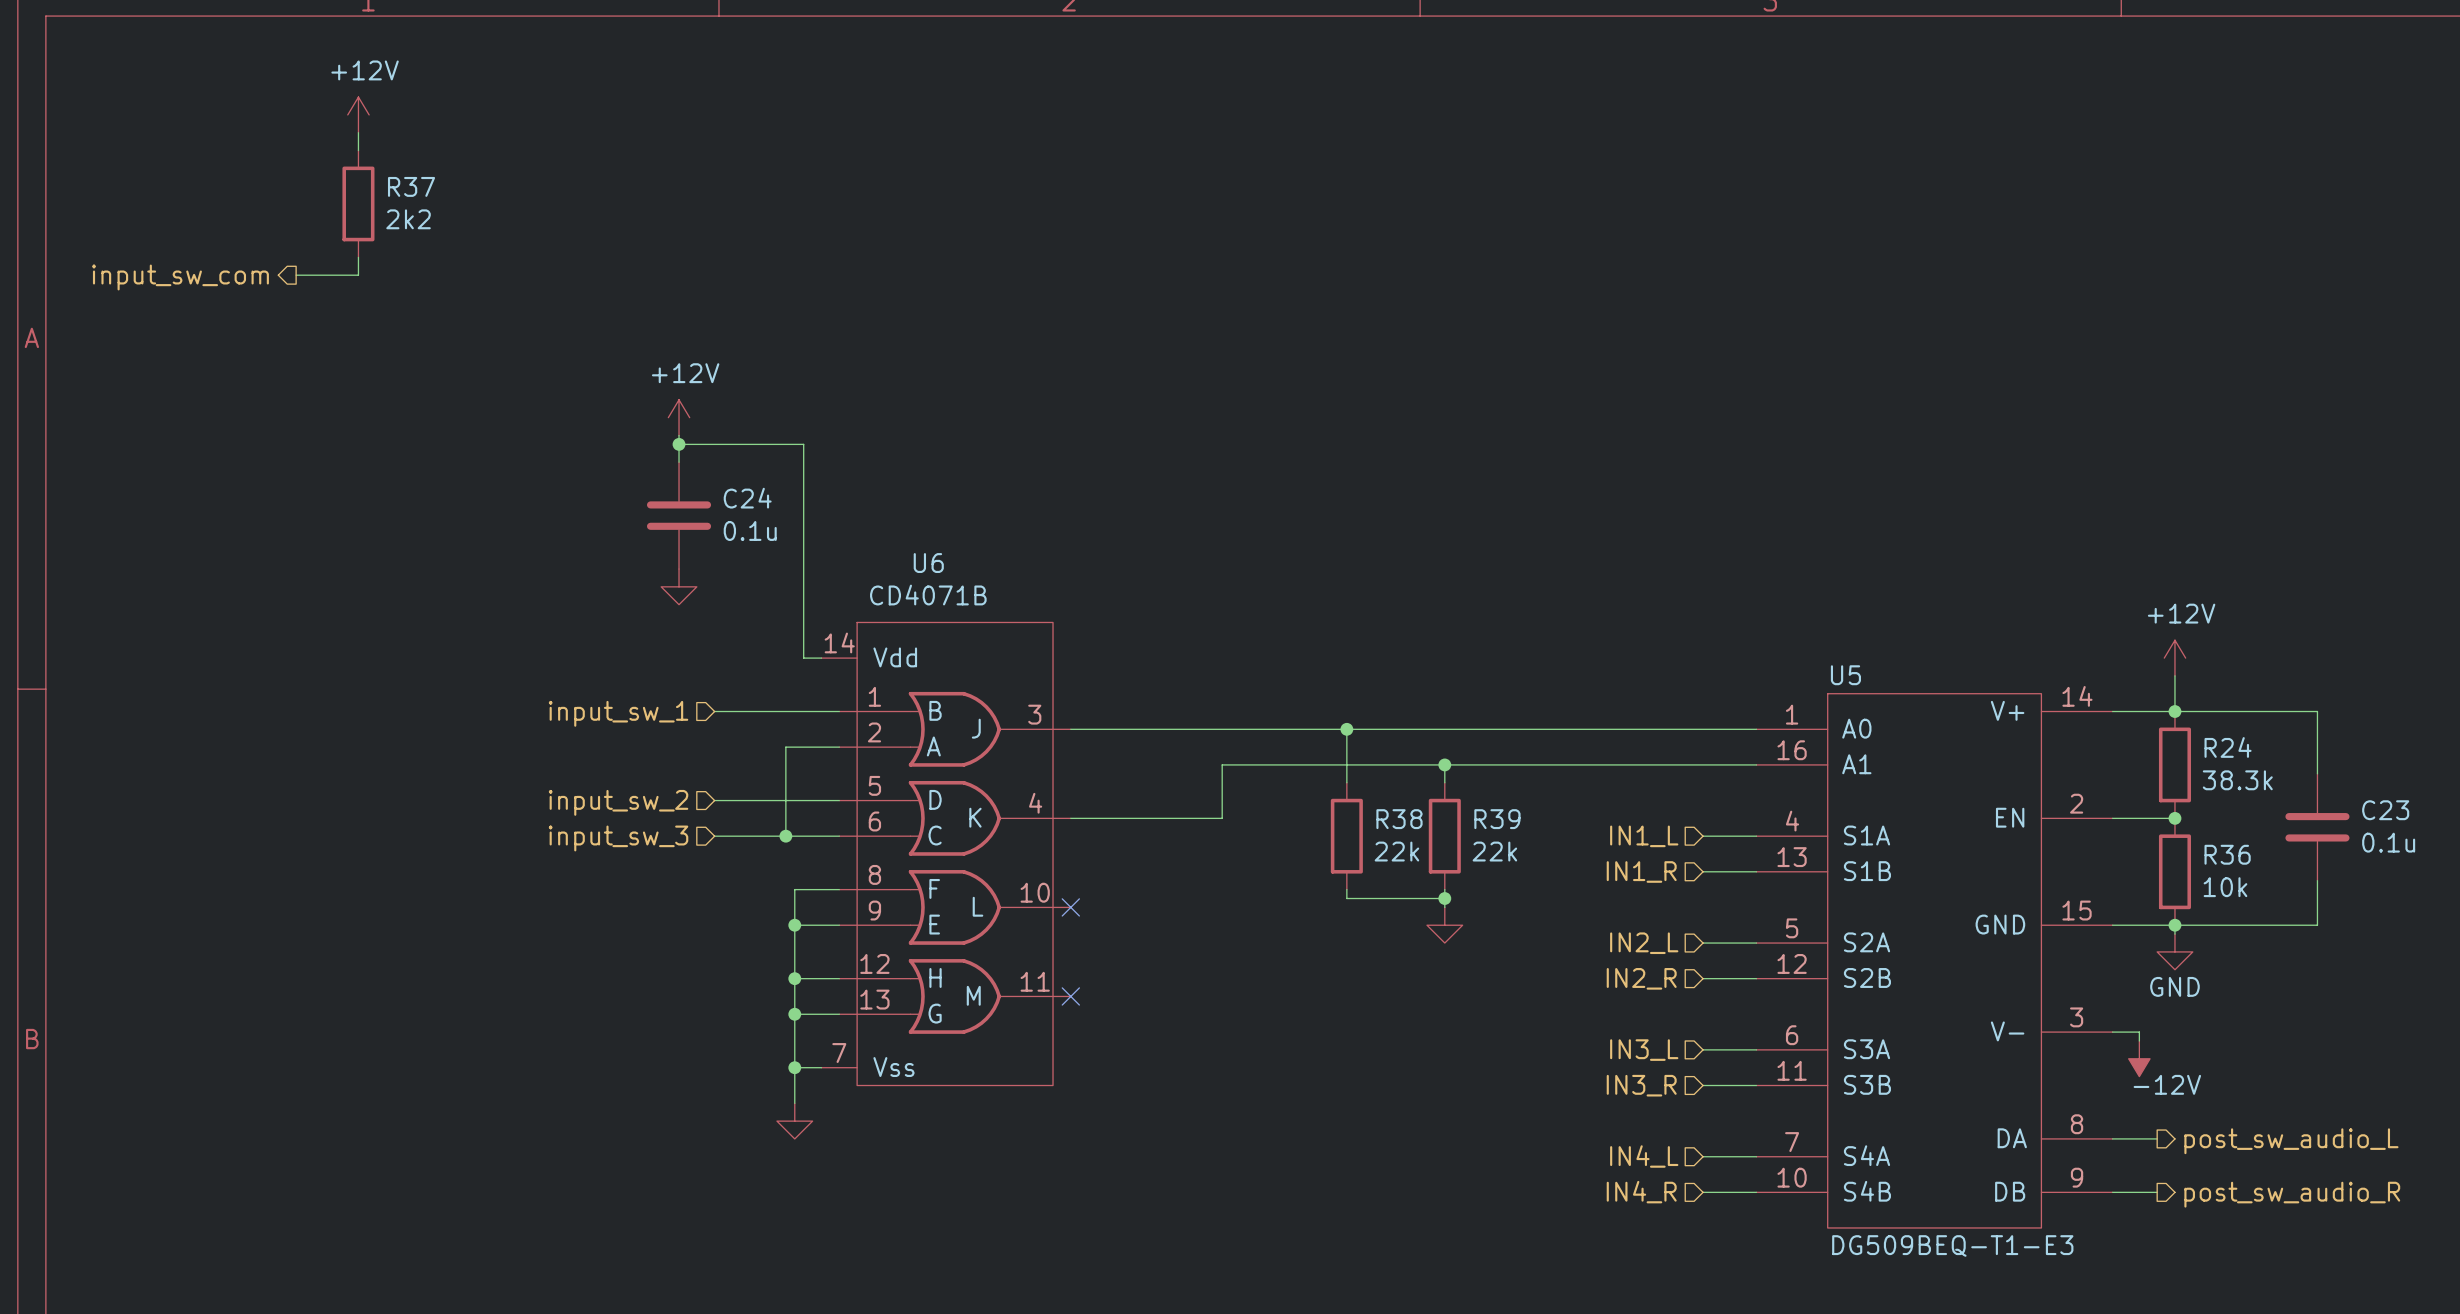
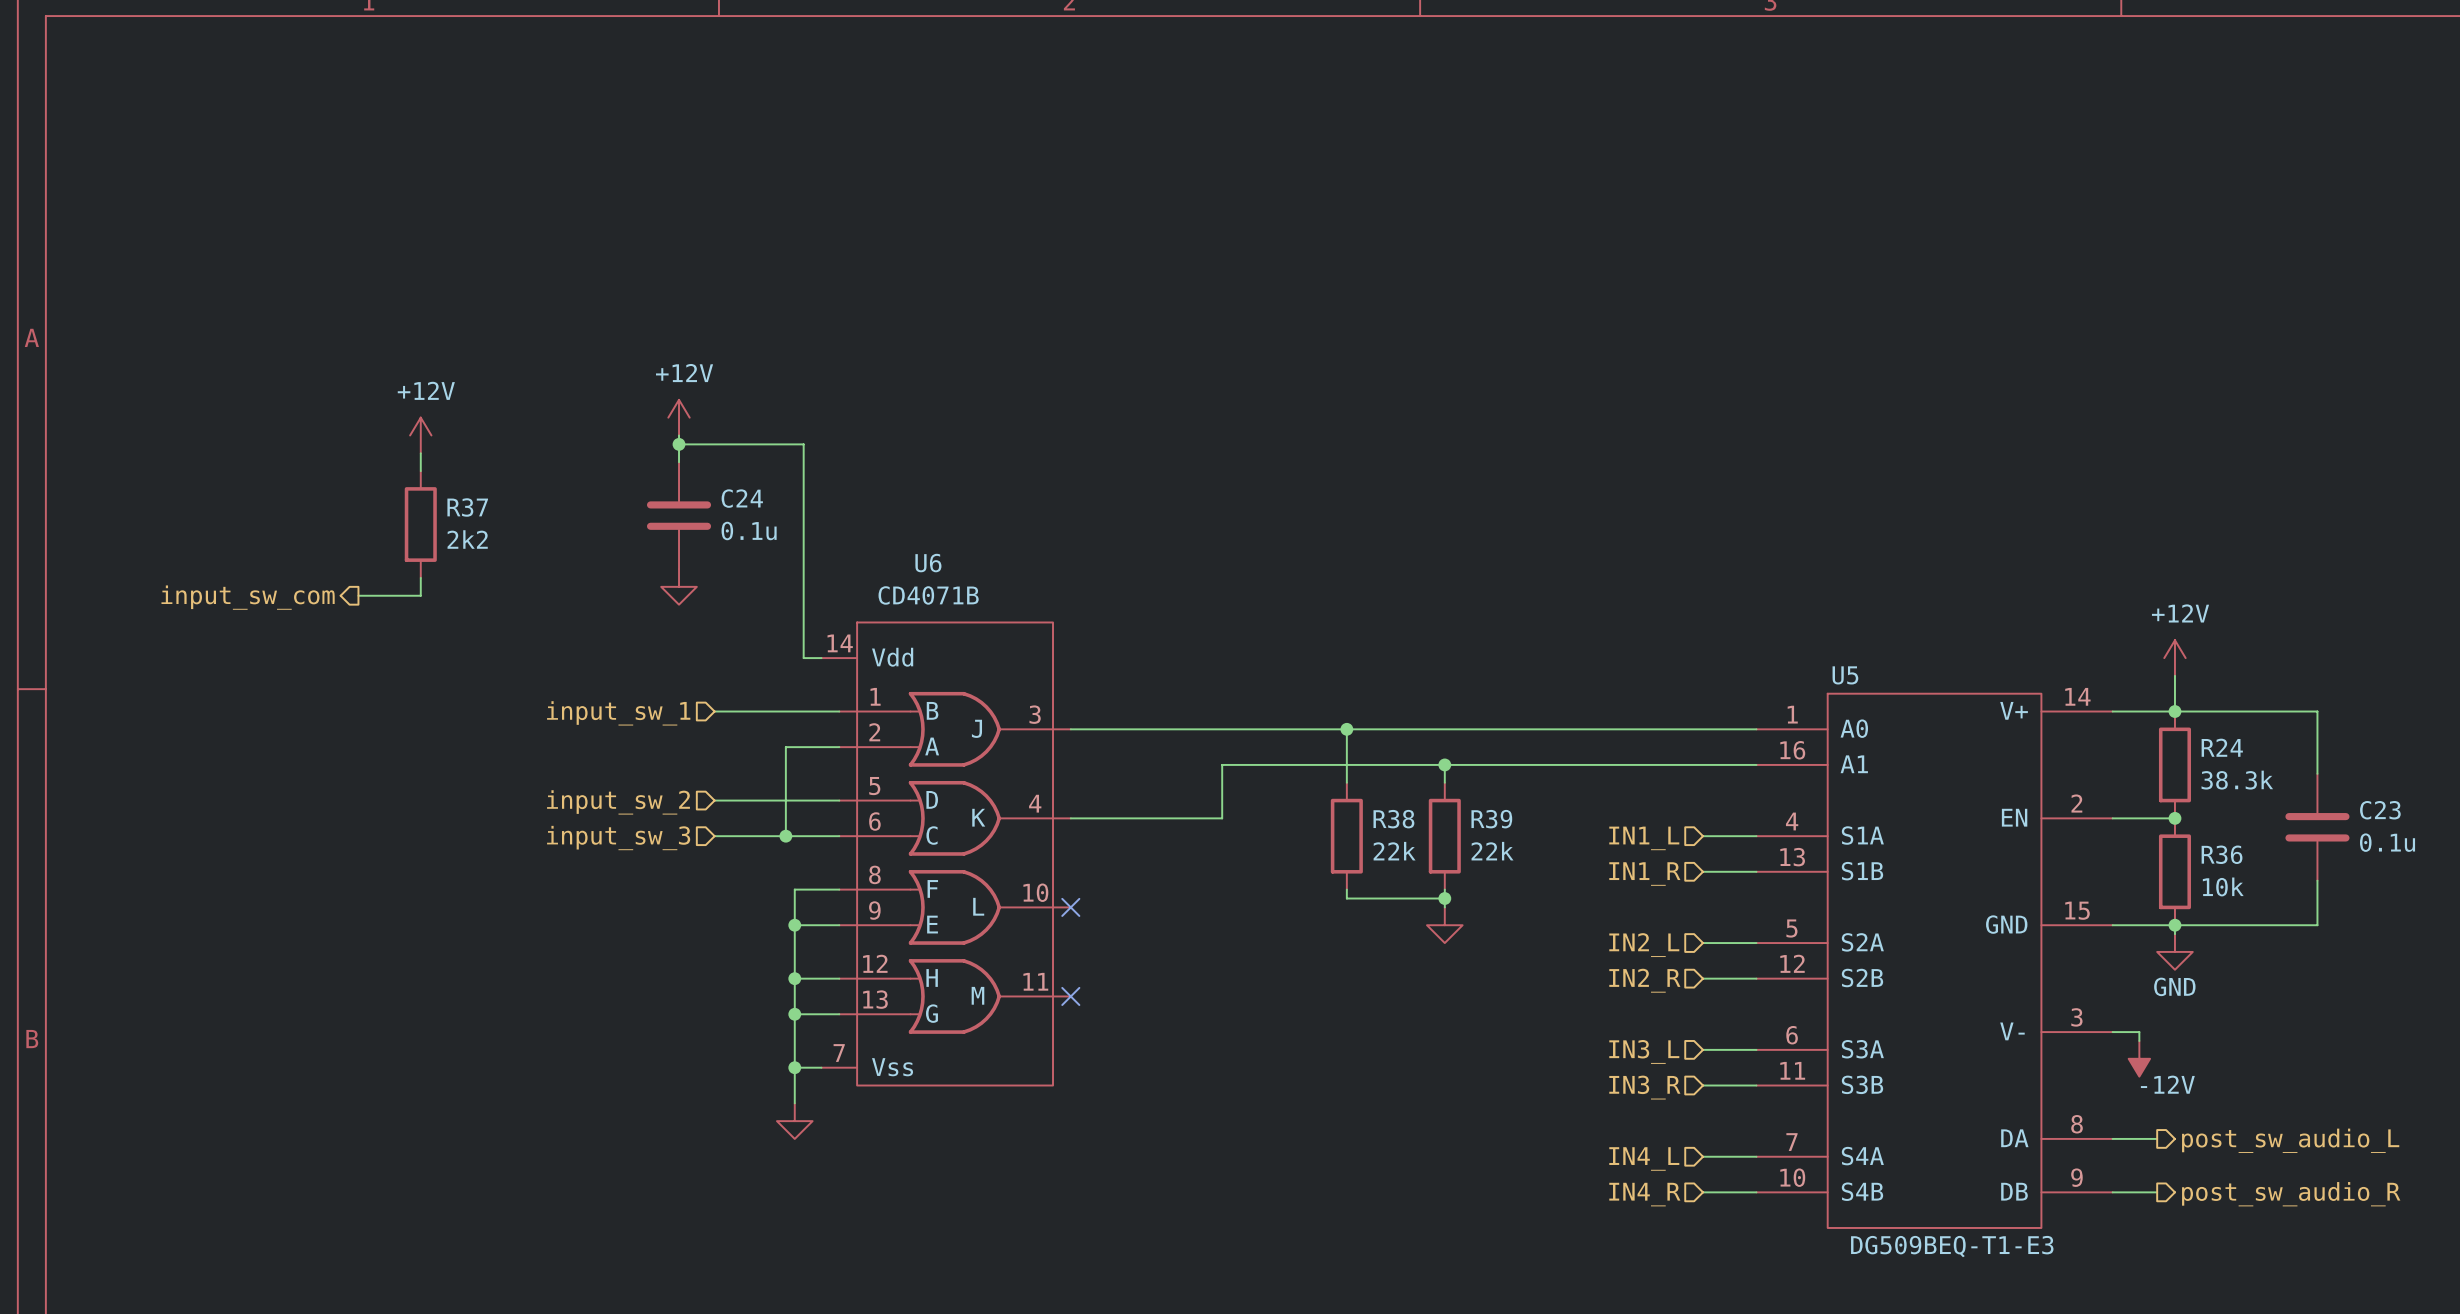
power symbol position: +12V (358, 114) -> +12V (420, 435)
wire: (358, 132) (358, 150) -> (420, 453) (420, 471)
R37 position: (358, 203) -> (420, 524)
wire: (358, 257) (358, 275) (296, 275) -> (420, 577) (420, 595) (358, 595)
hierarchical label position: input_sw_com (180, 277) -> input_sw_com (248, 597)

